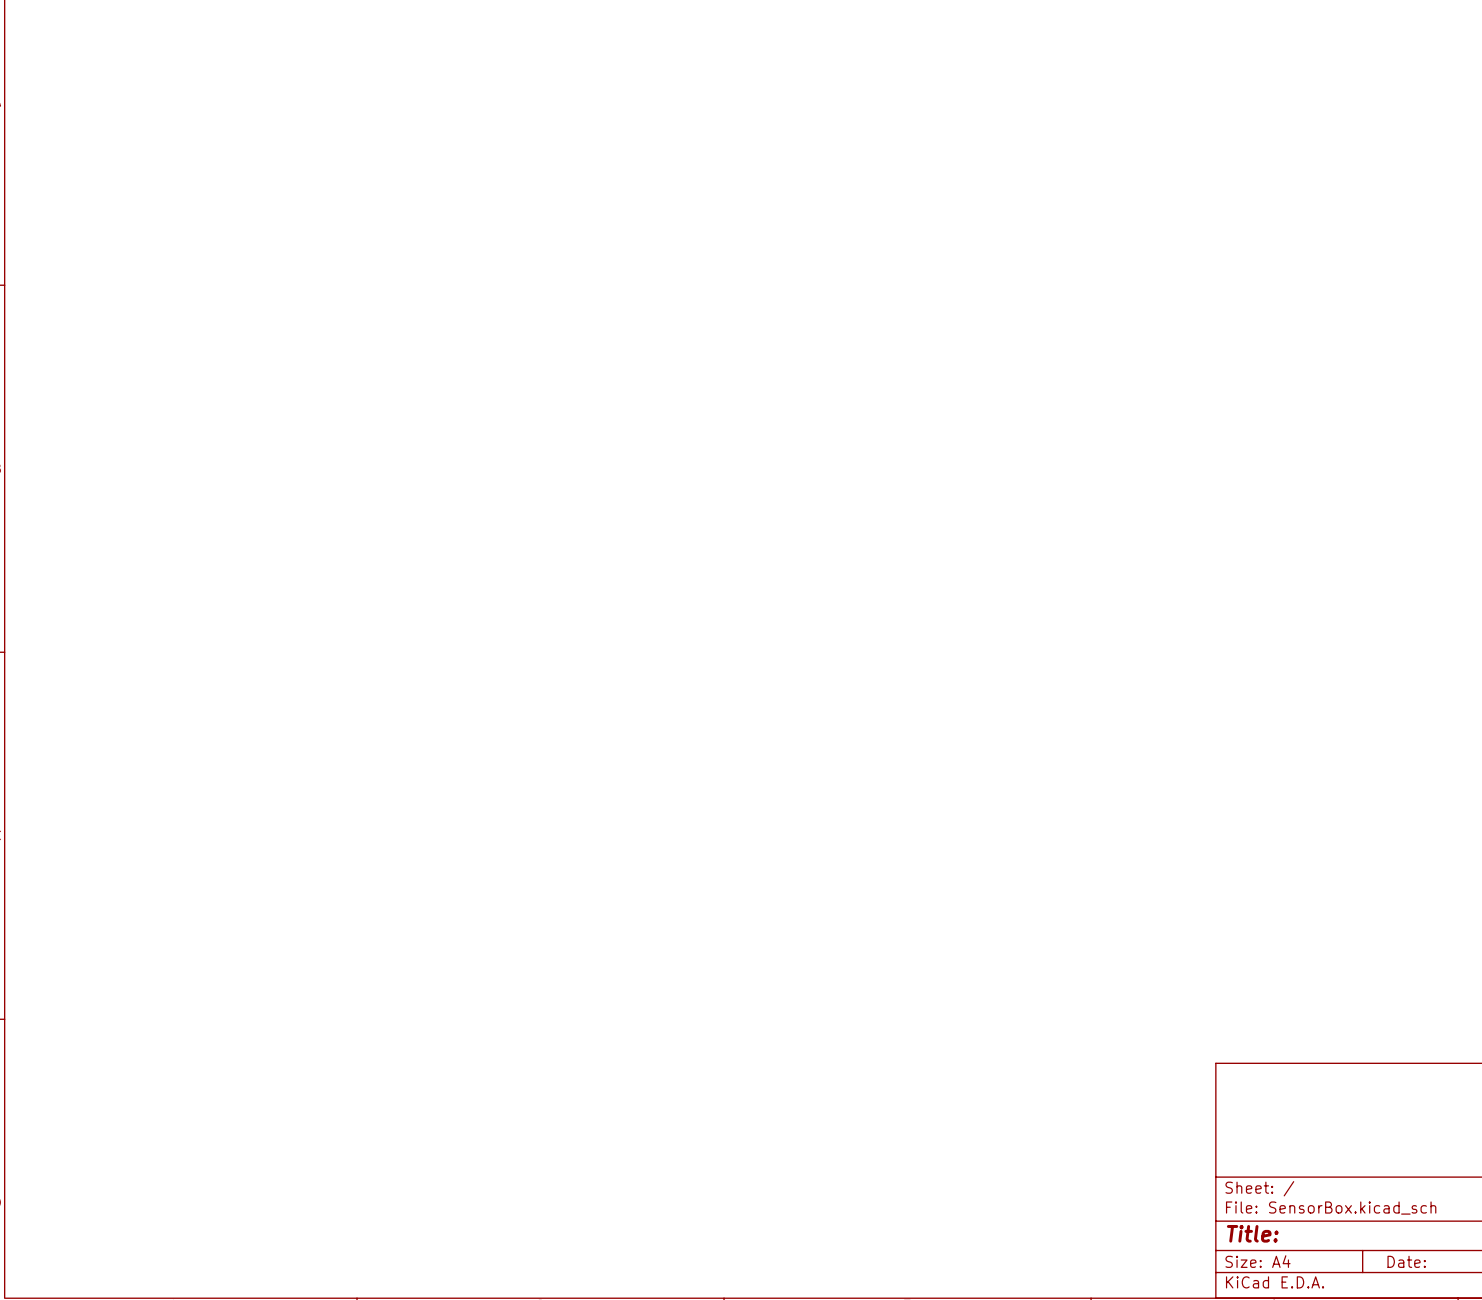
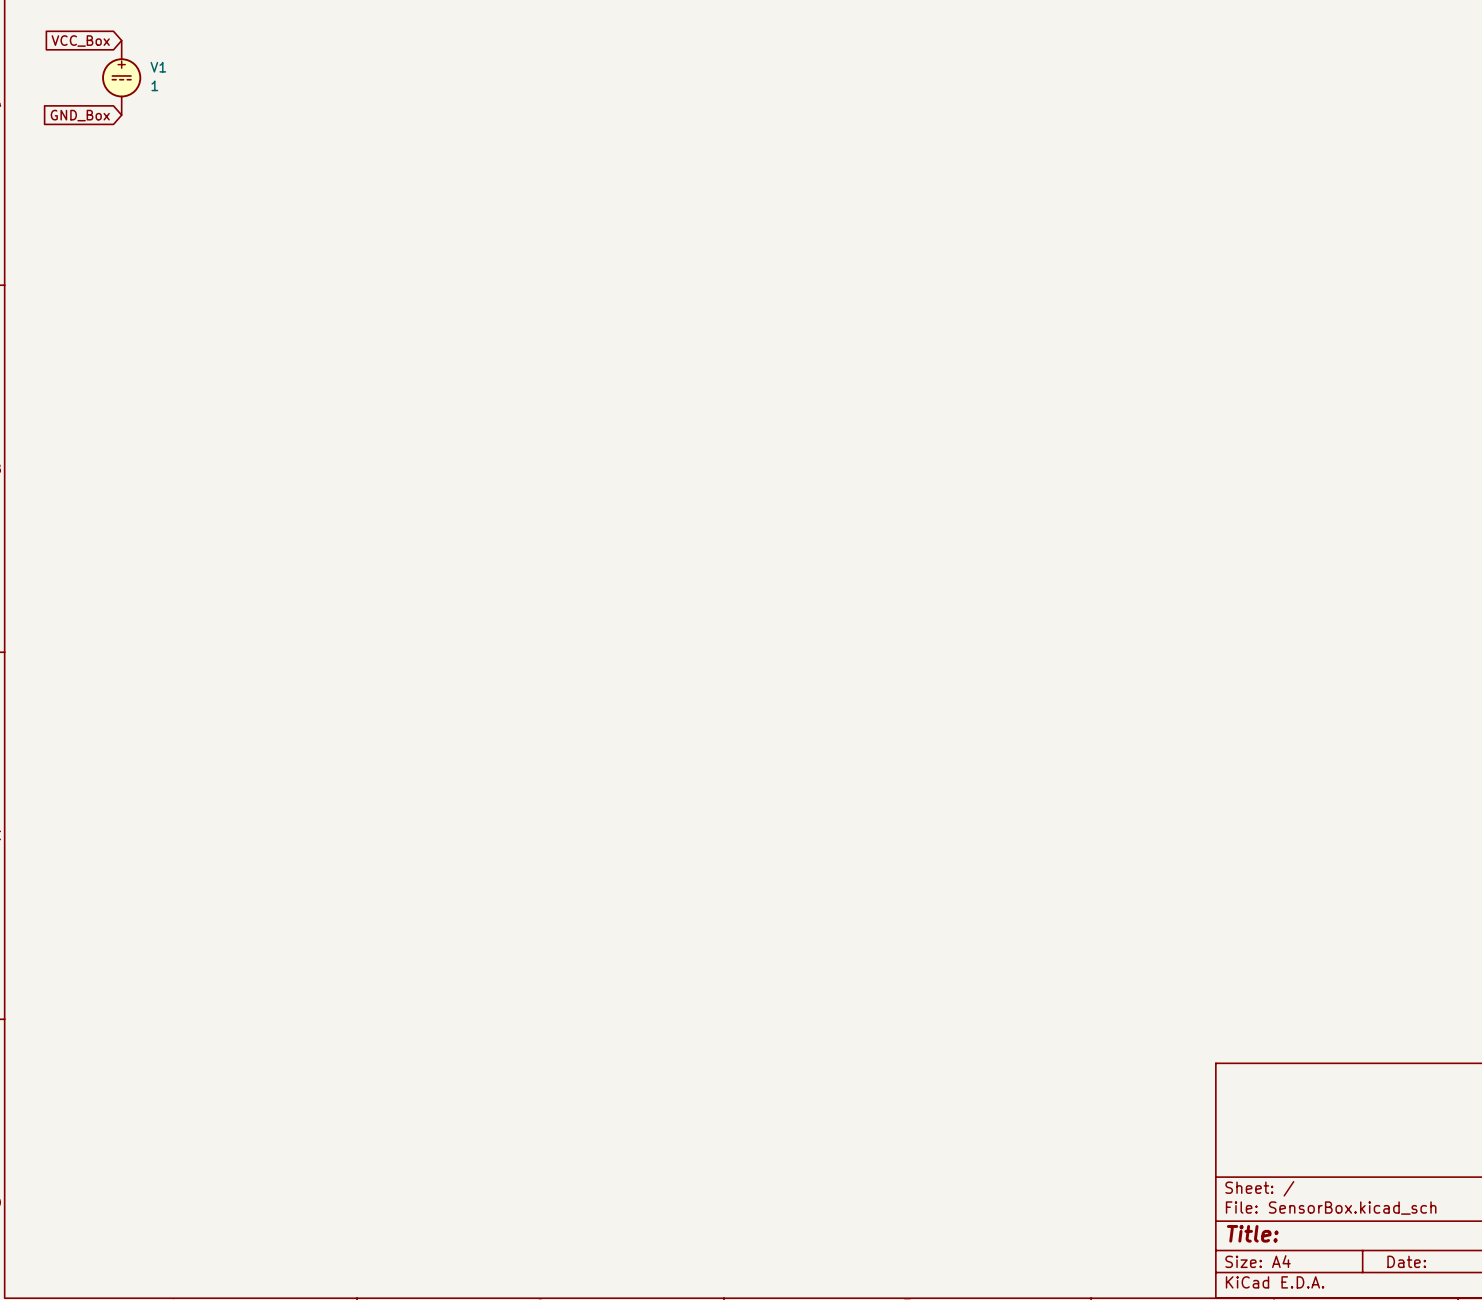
global label: none -> VCC_Box (80, 41)
V1: none -> 1 (121, 77)
global label: none -> GND_Box (80, 115)

